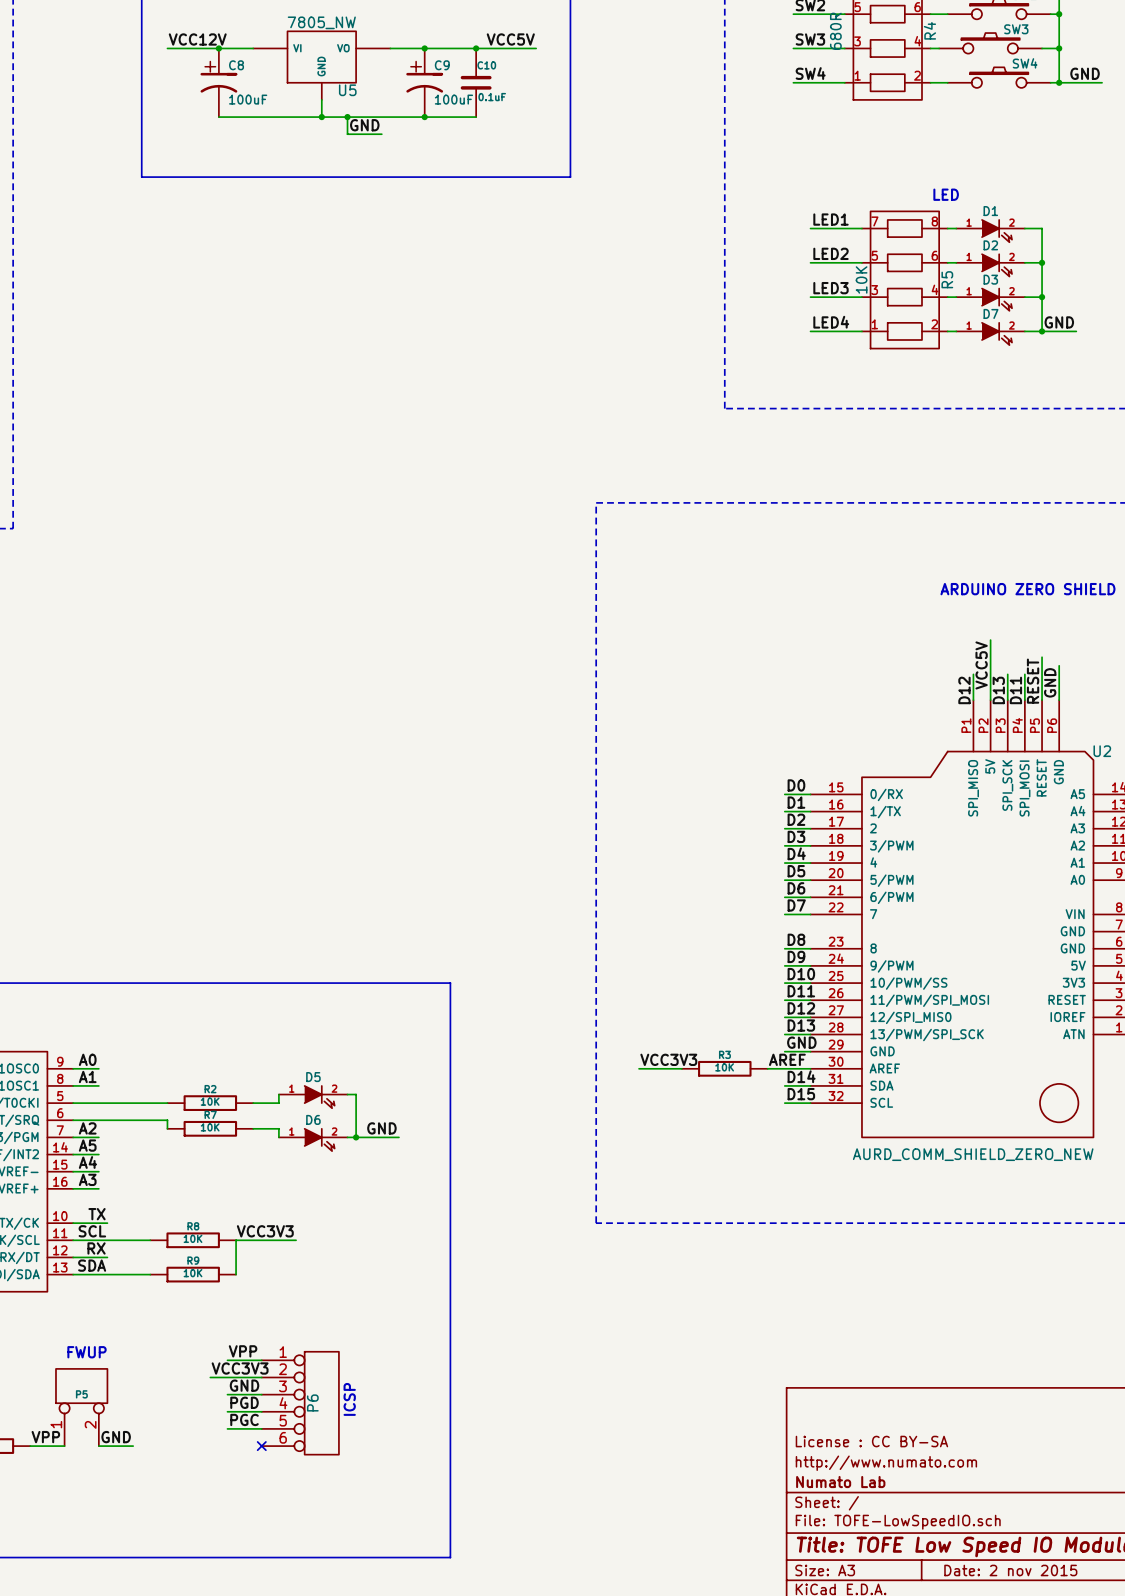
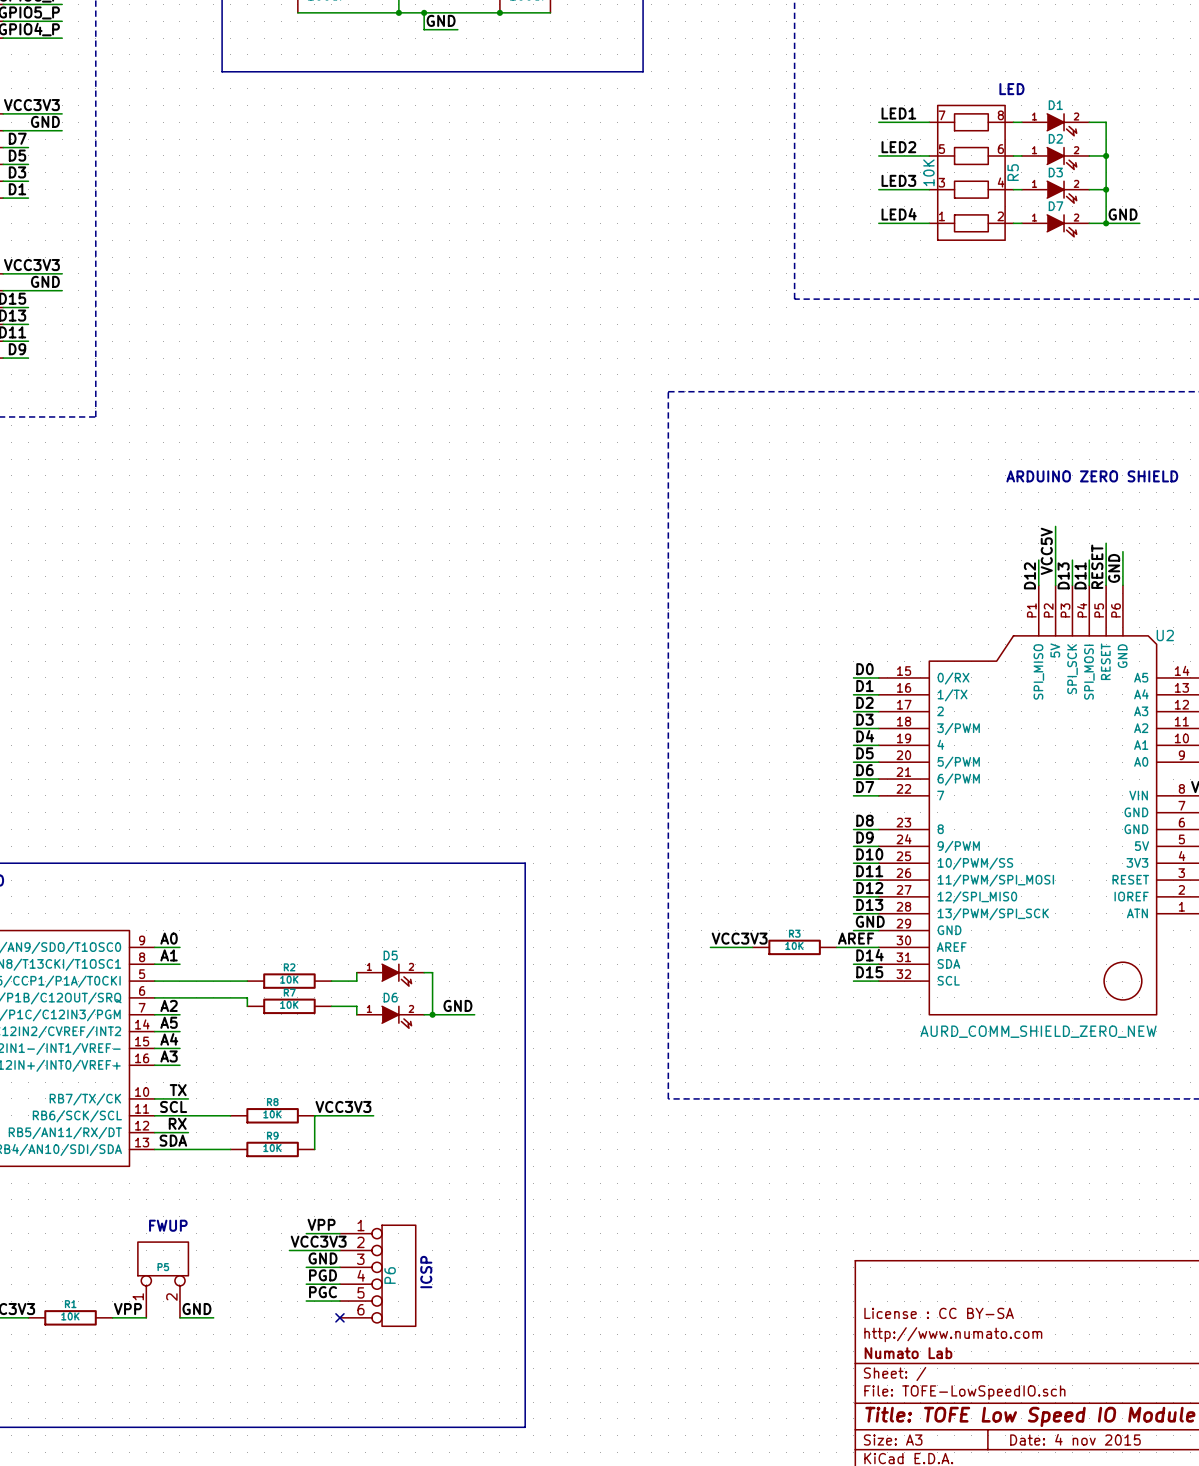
title block: Date: 2 nov 2015 (1010, 1570) -> Date: 4 nov 2015 (1075, 1439)

